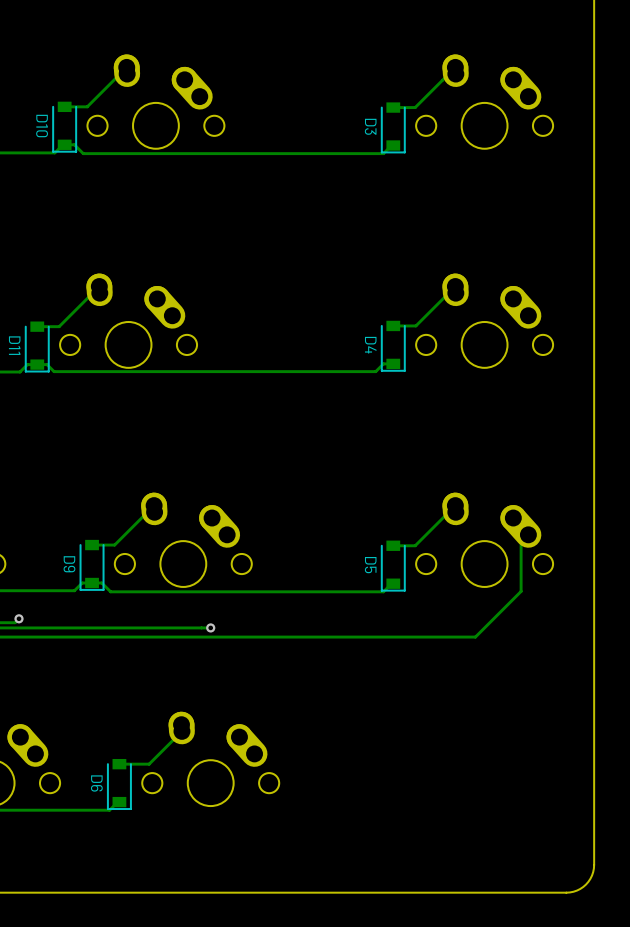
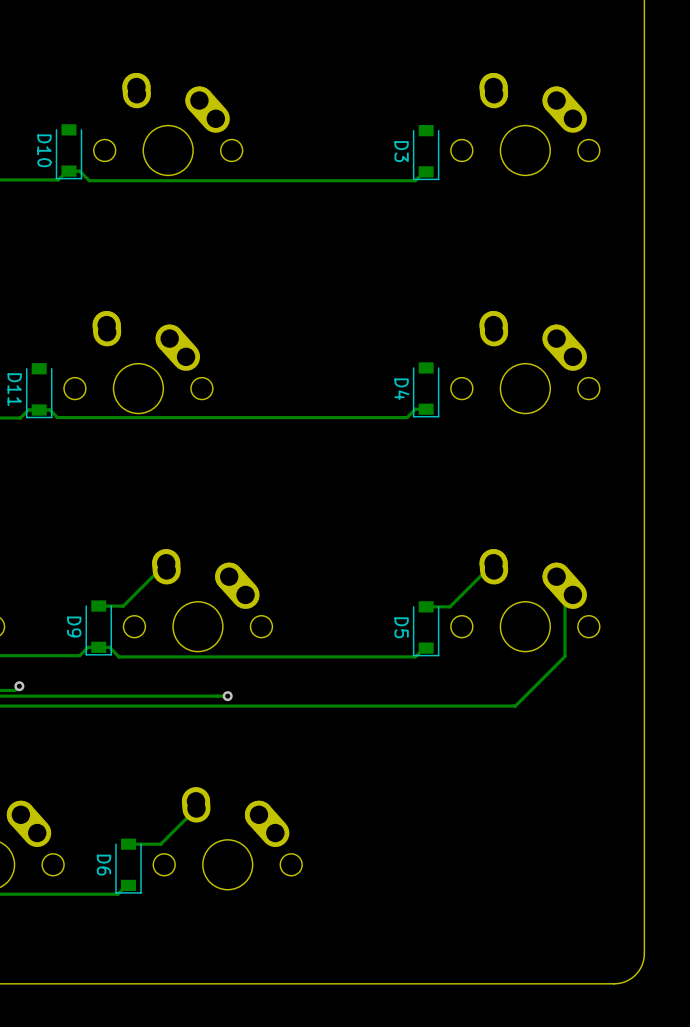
track: (455, 67) (415, 107) (393, 107) -> none
track: (127, 74) (120, 74) (87, 106) (64, 106) -> none
track: (99, 286) (59, 326) (37, 326) -> none
track: (455, 286) (415, 325) (393, 325) -> none

